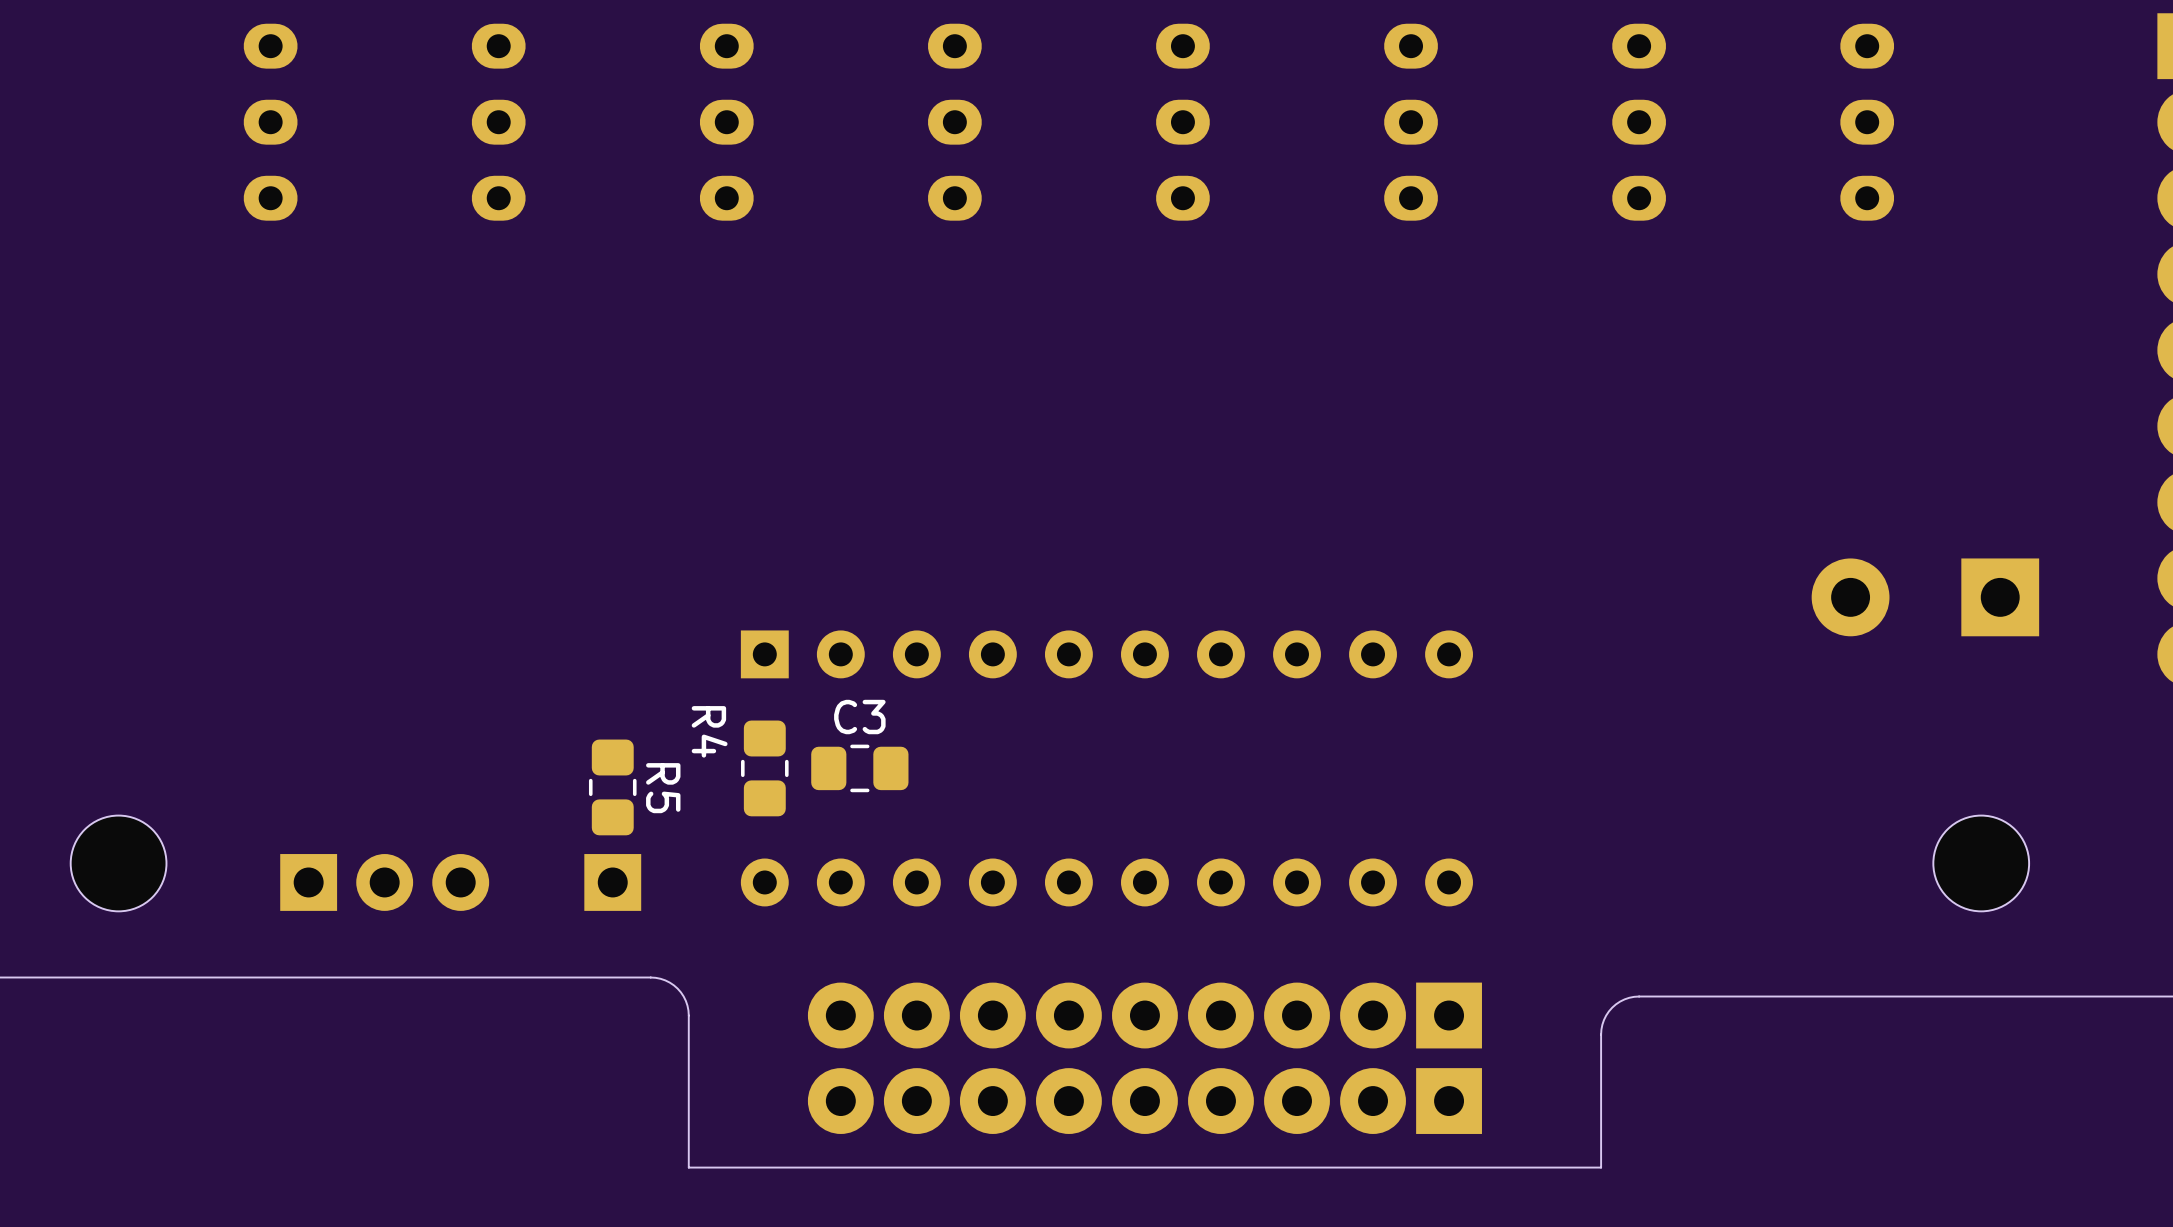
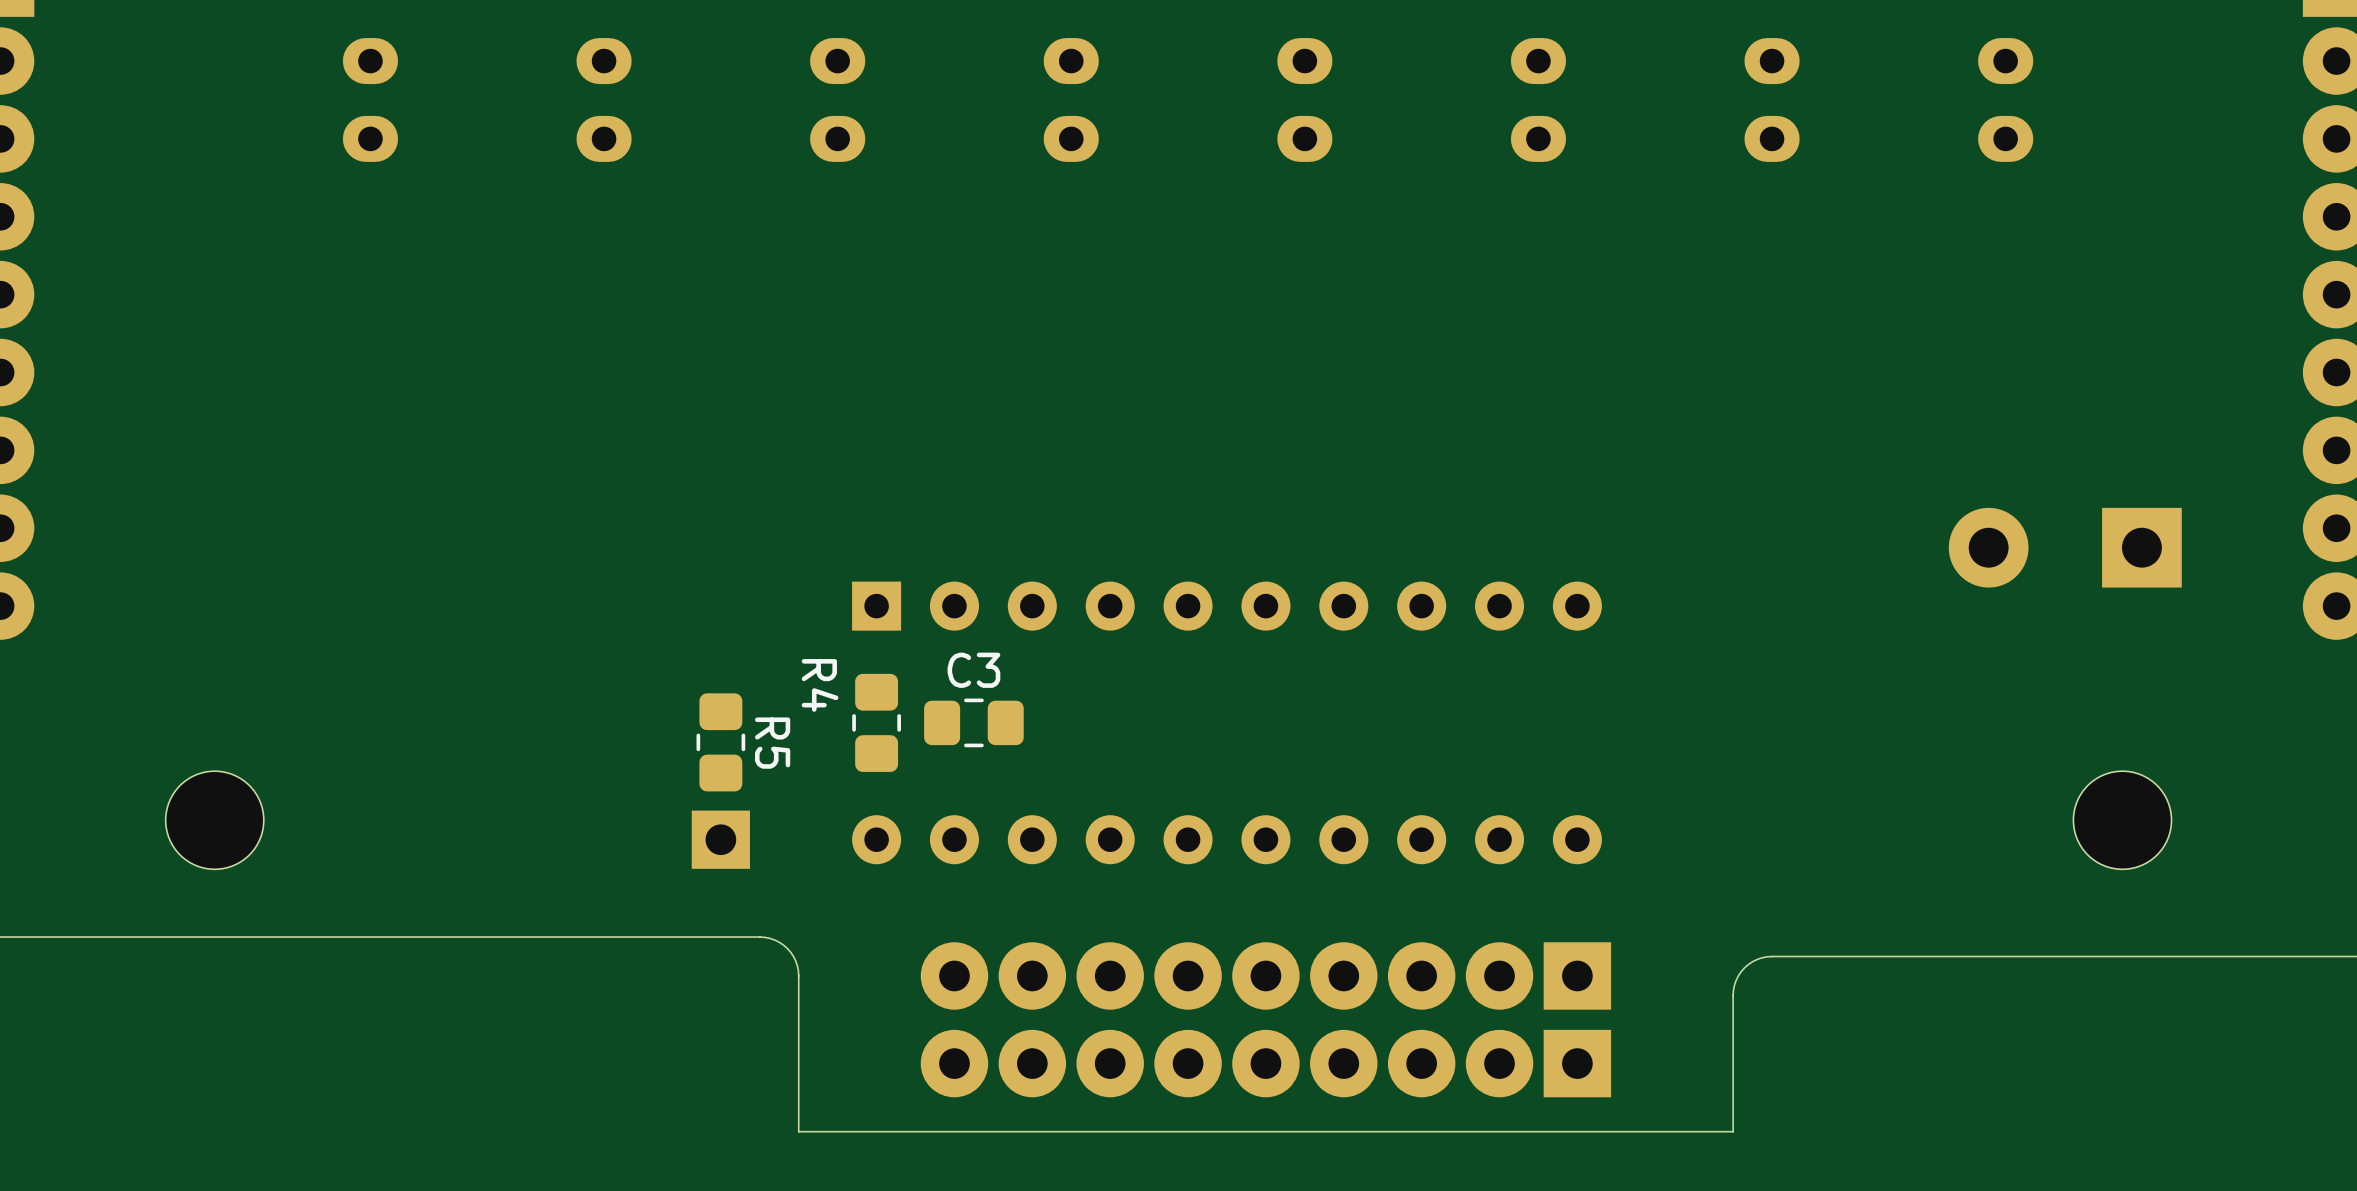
part: (384, 882) -> none

